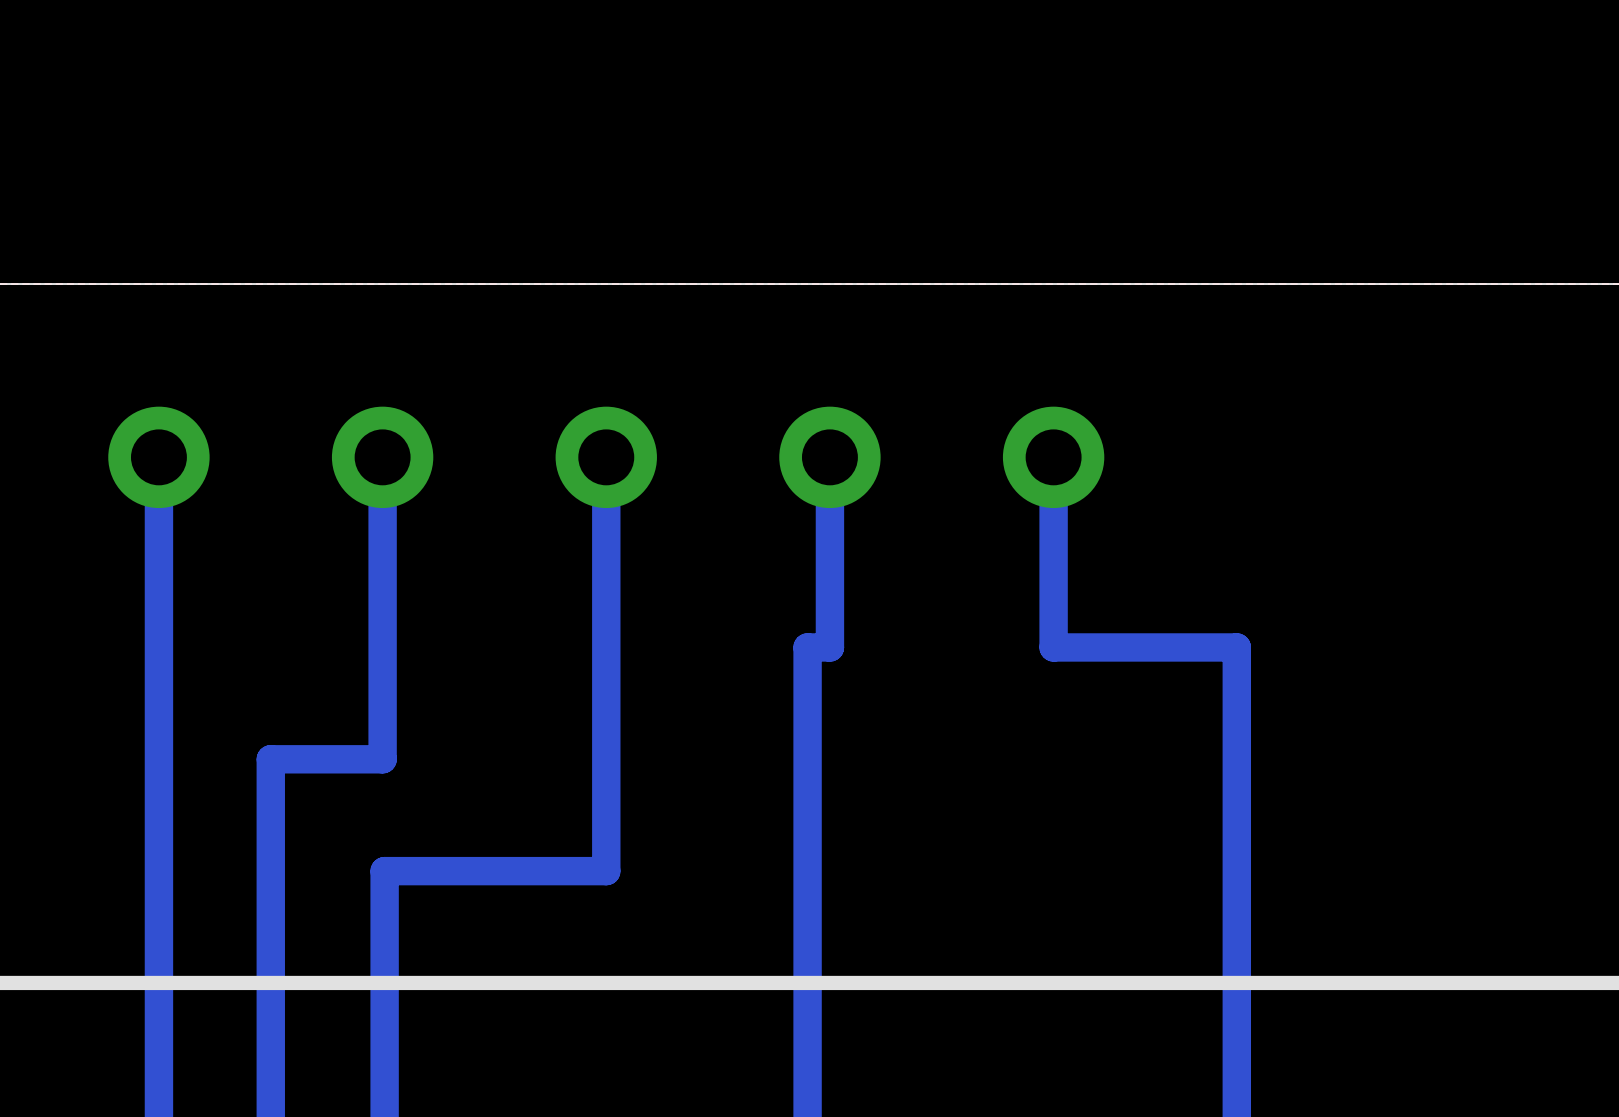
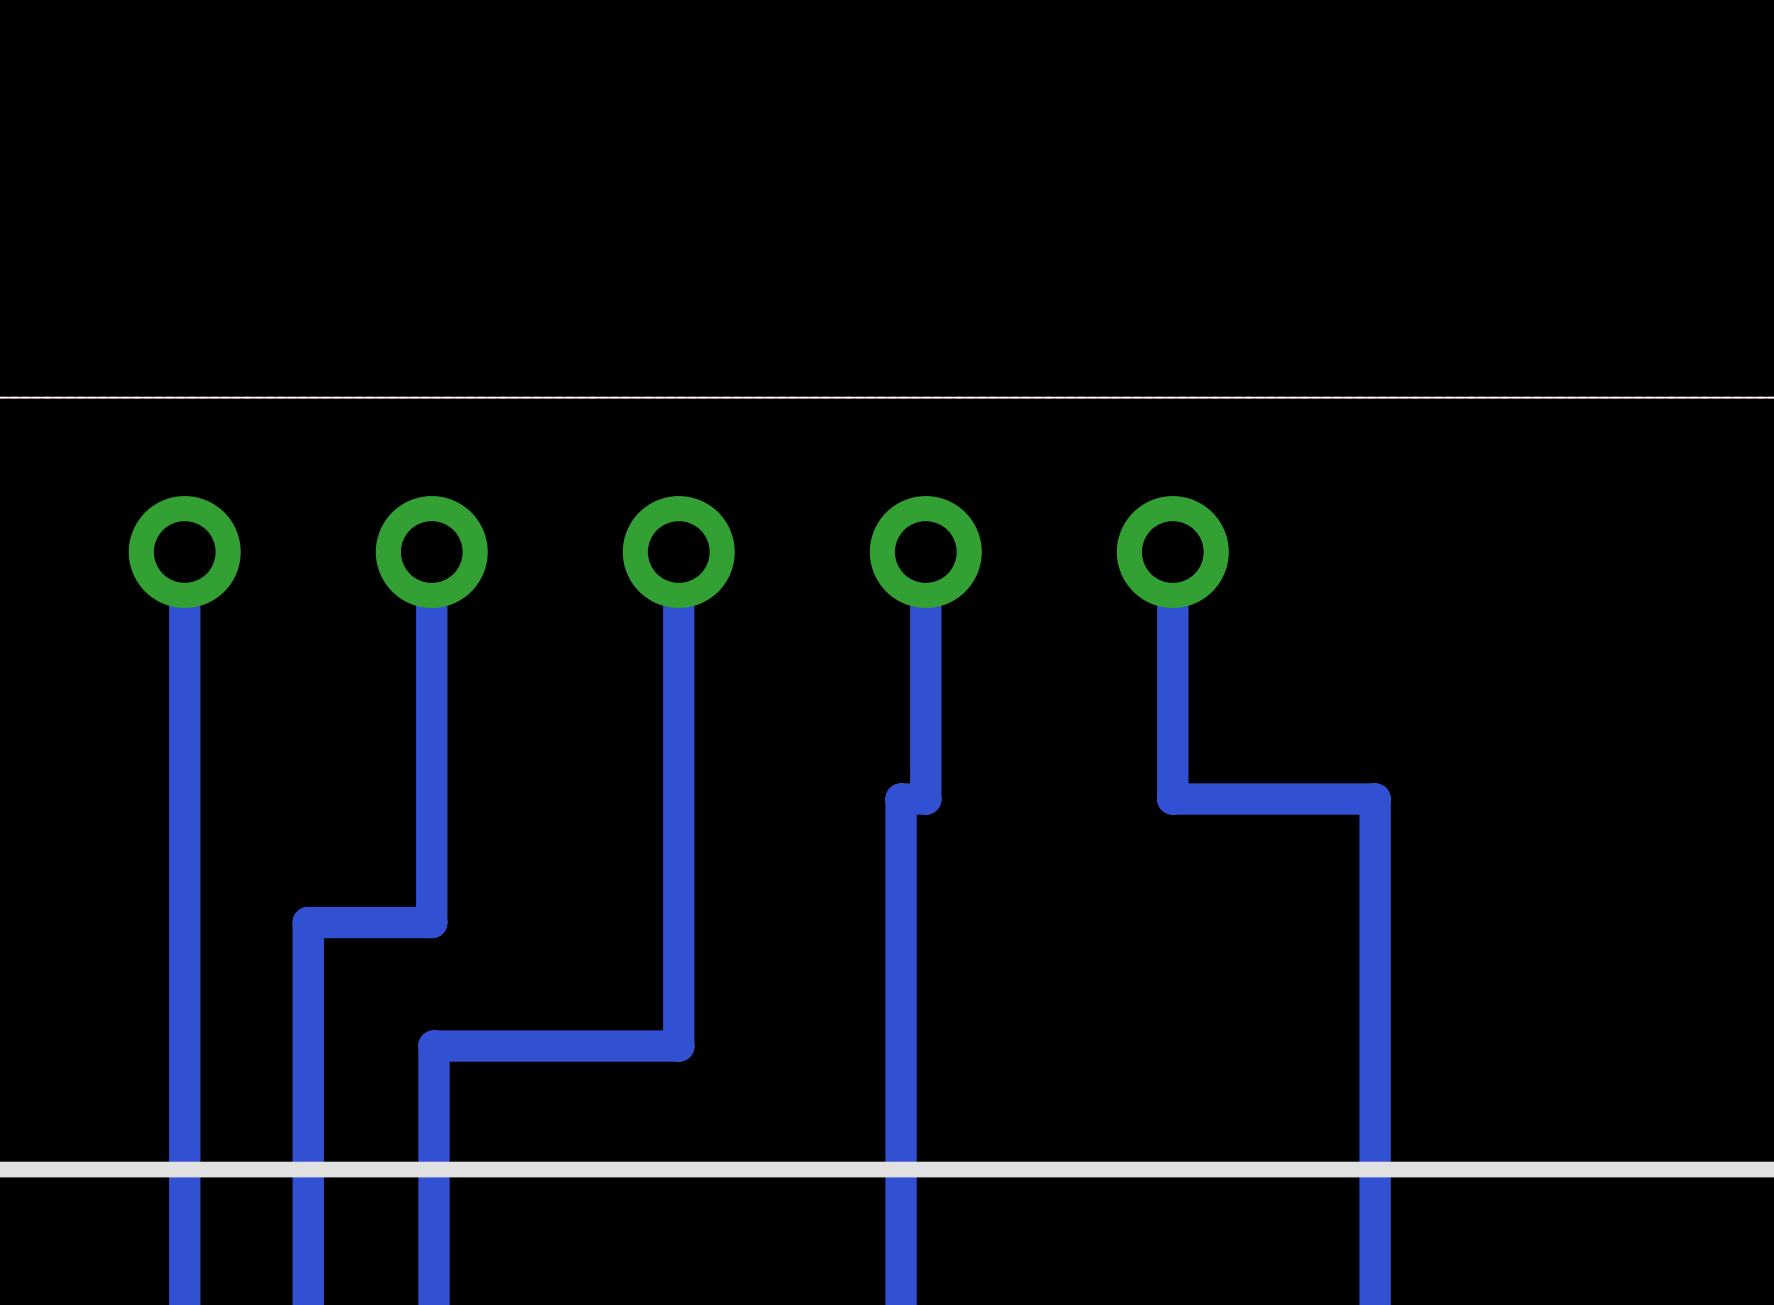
via position: (158, 457) -> (184, 552)
via position: (382, 457) -> (431, 552)
via position: (606, 457) -> (678, 552)
via position: (829, 457) -> (925, 552)
via position: (1053, 457) -> (1172, 552)

